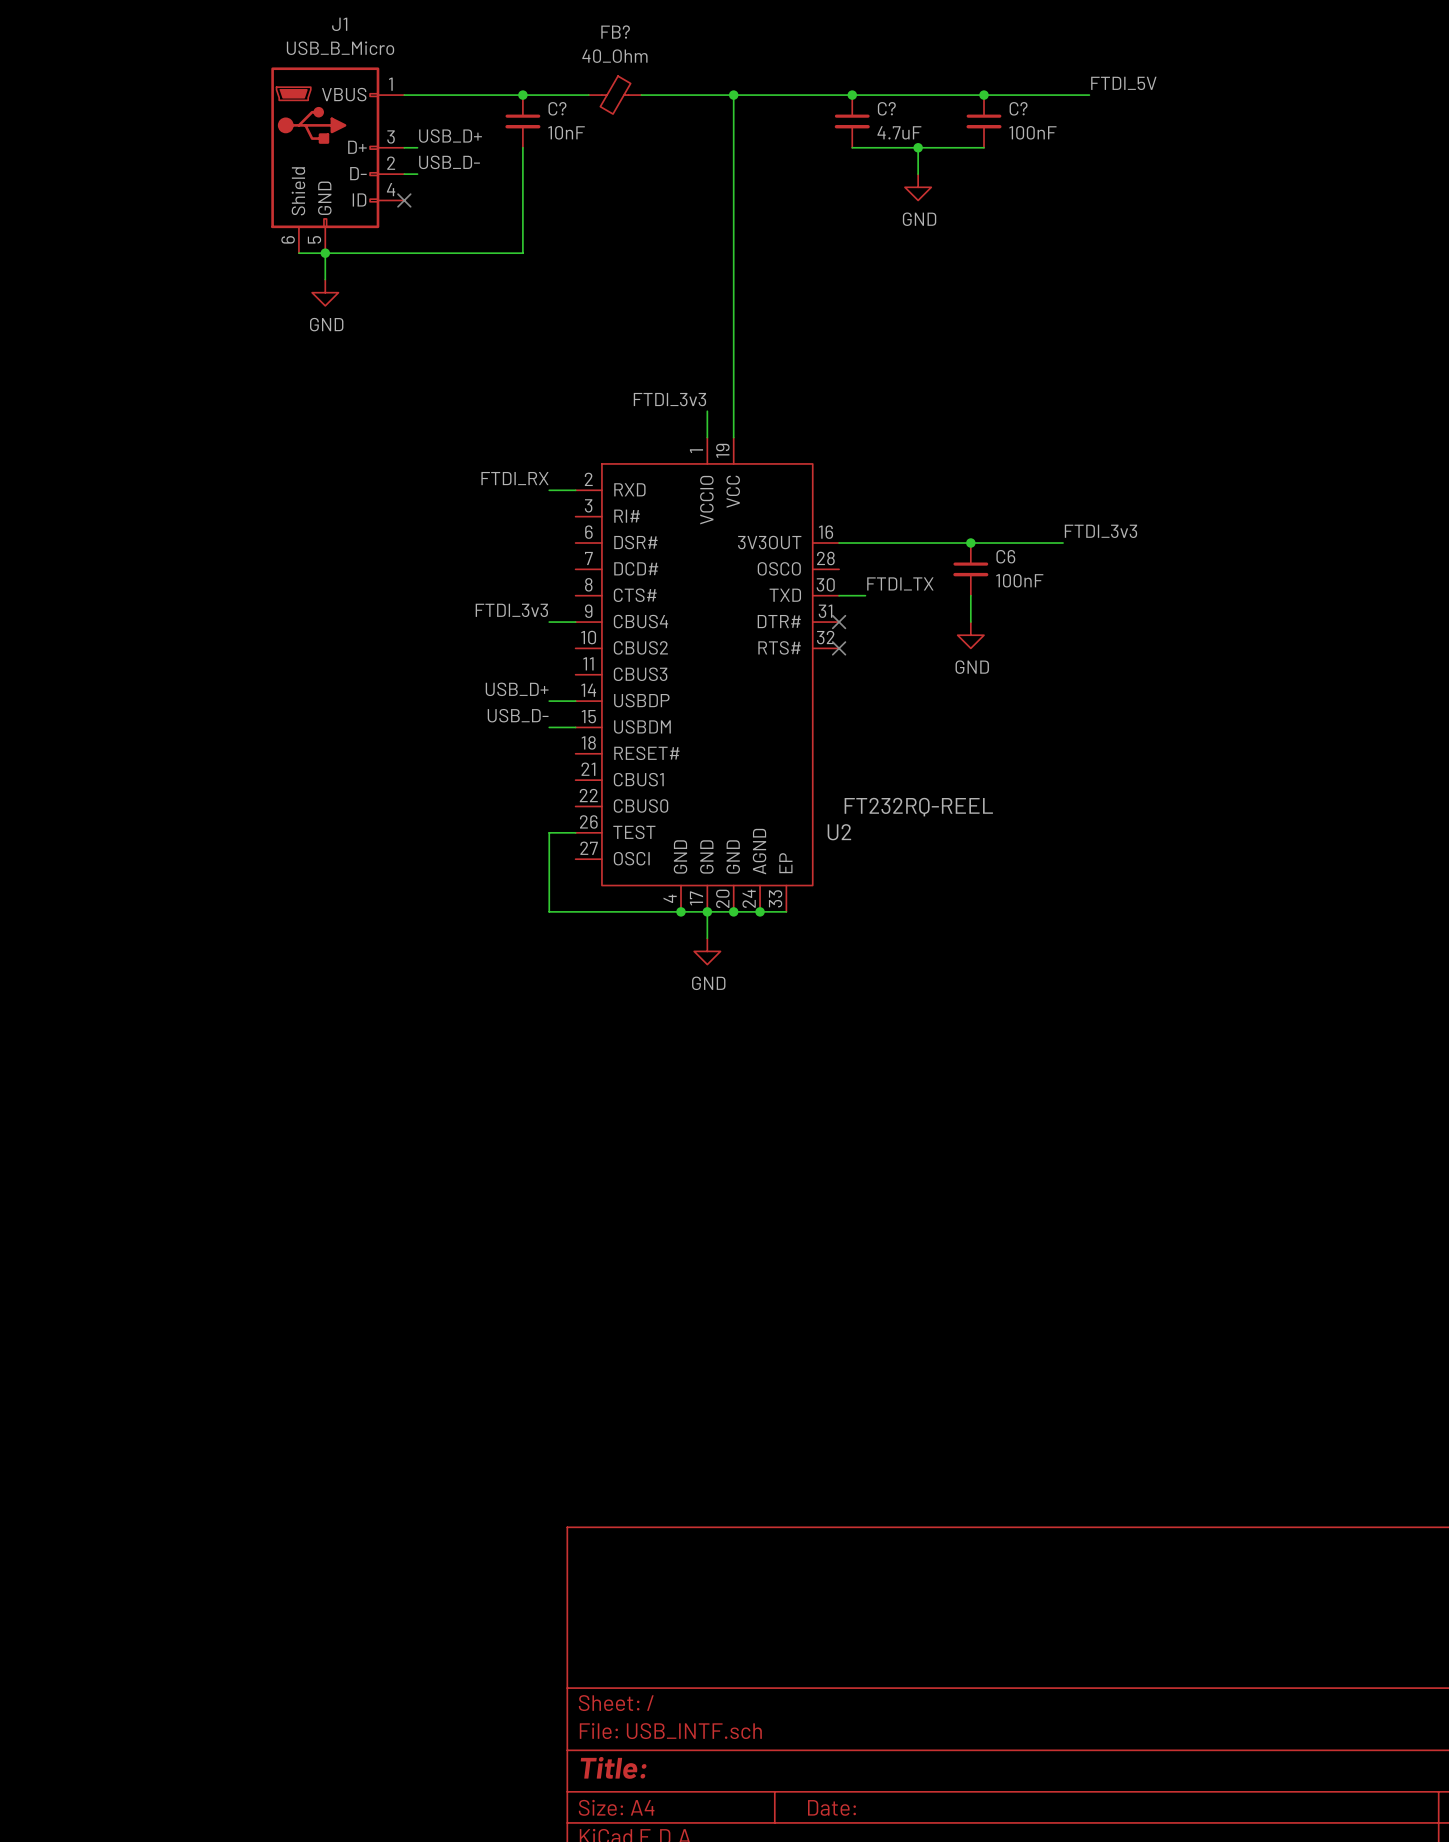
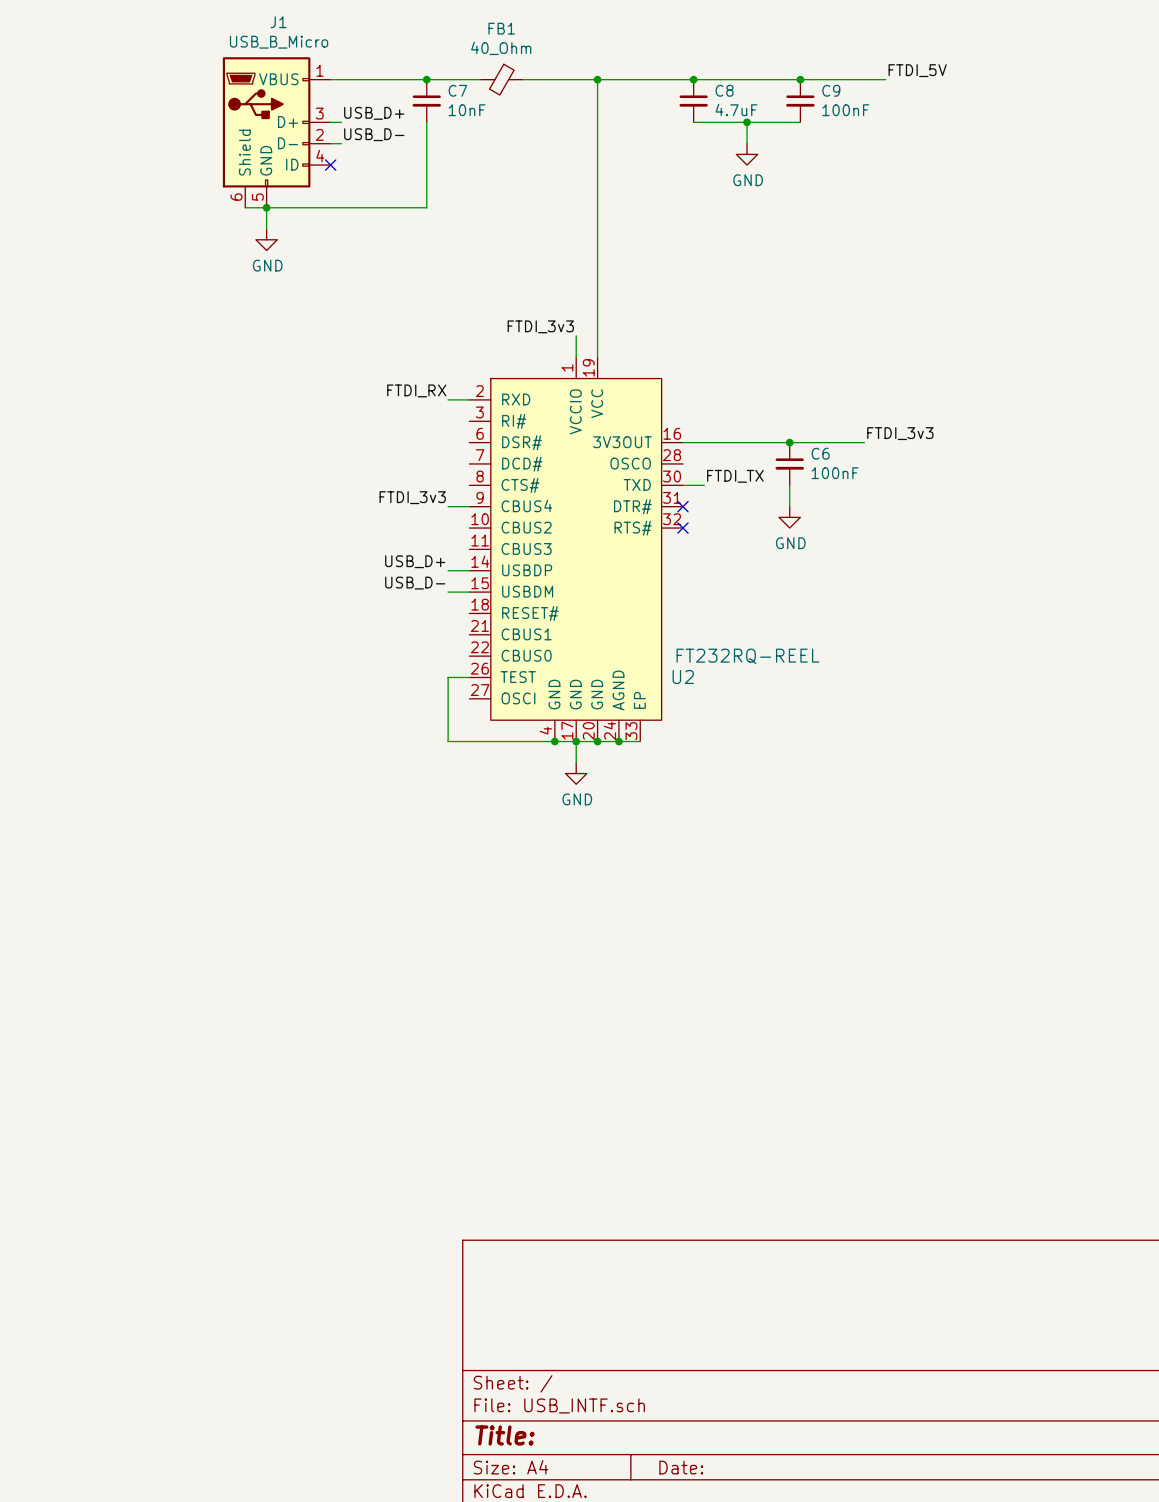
FB? name: FB? (615, 32) -> FB1 (501, 28)
C? name: C? (557, 108) -> C7 (457, 90)
C? name: C? (886, 108) -> C8 (724, 90)
C? name: C? (1018, 108) -> C9 (831, 90)

